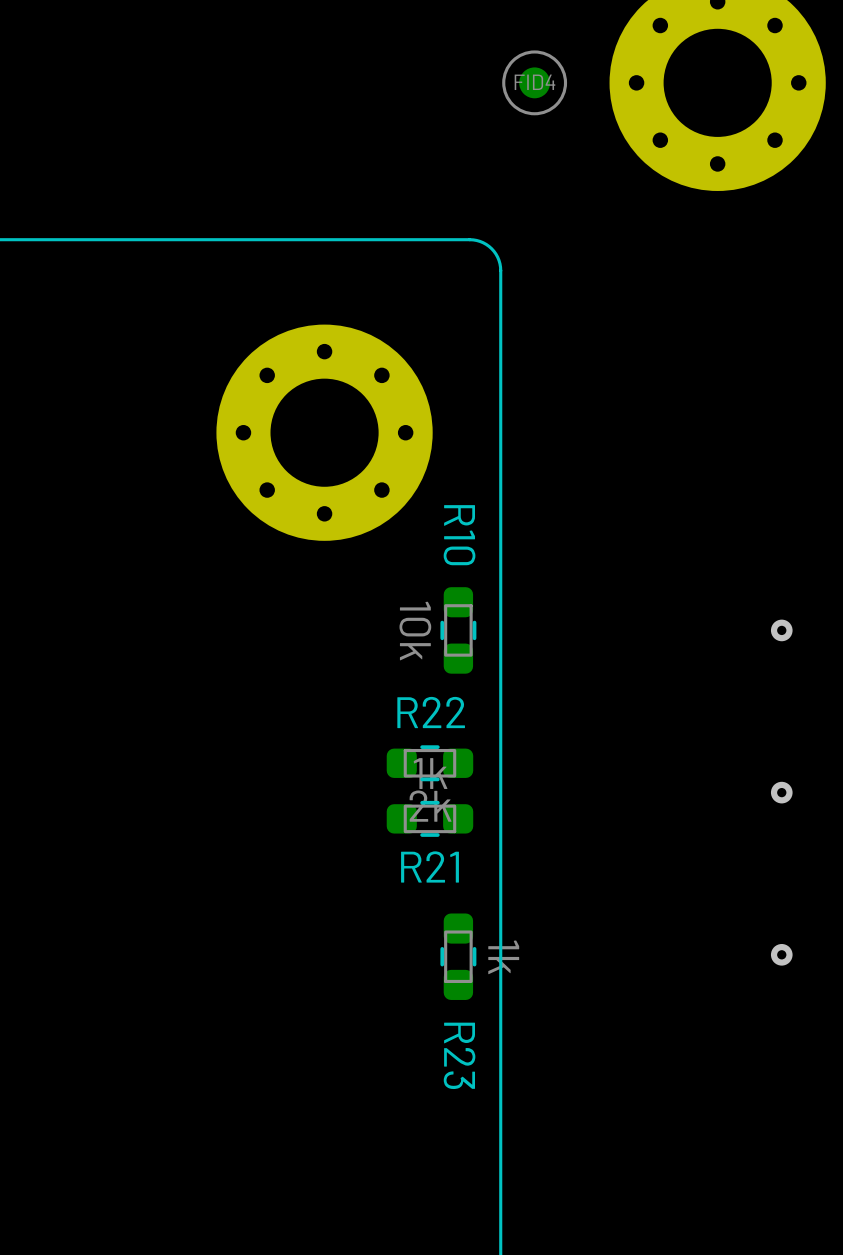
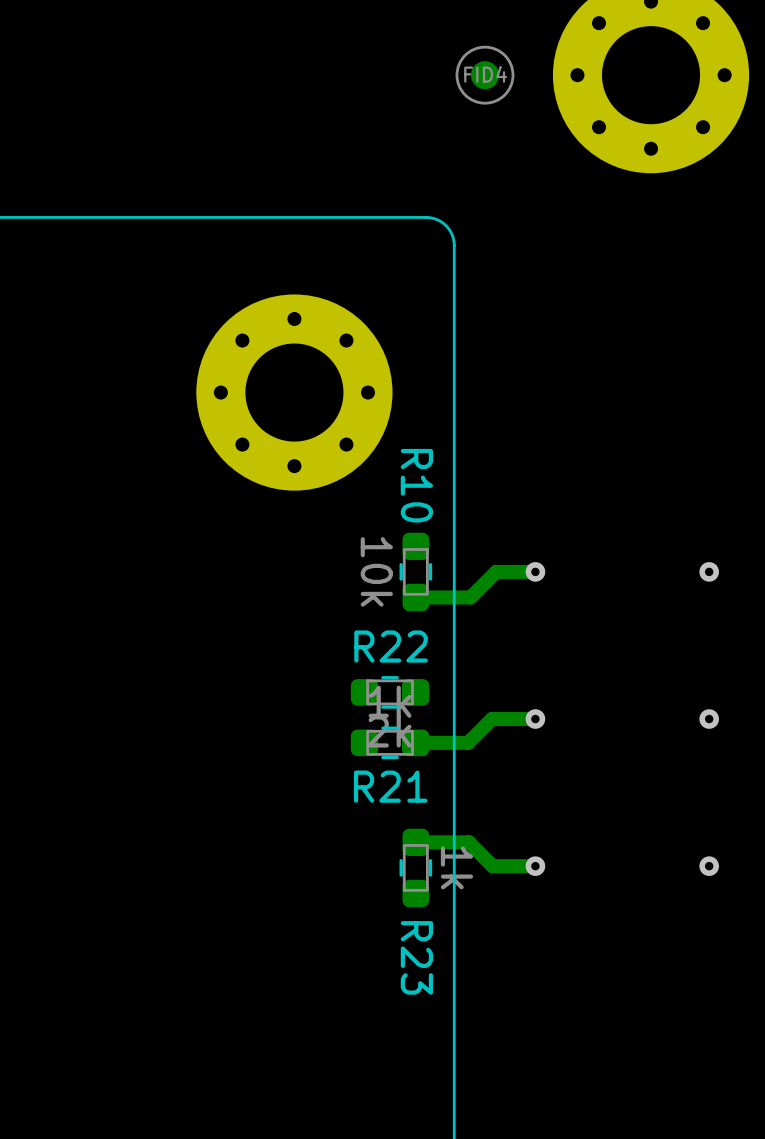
track: none -> (535, 571) (496, 571) (470, 597) (415, 597)
via: none -> (535, 571)
track: none -> (535, 719) (491, 719) (468, 742) (415, 742)
via: none -> (535, 719)
track: none -> (415, 842) (468, 842) (492, 866) (535, 866)
via: none -> (535, 866)

